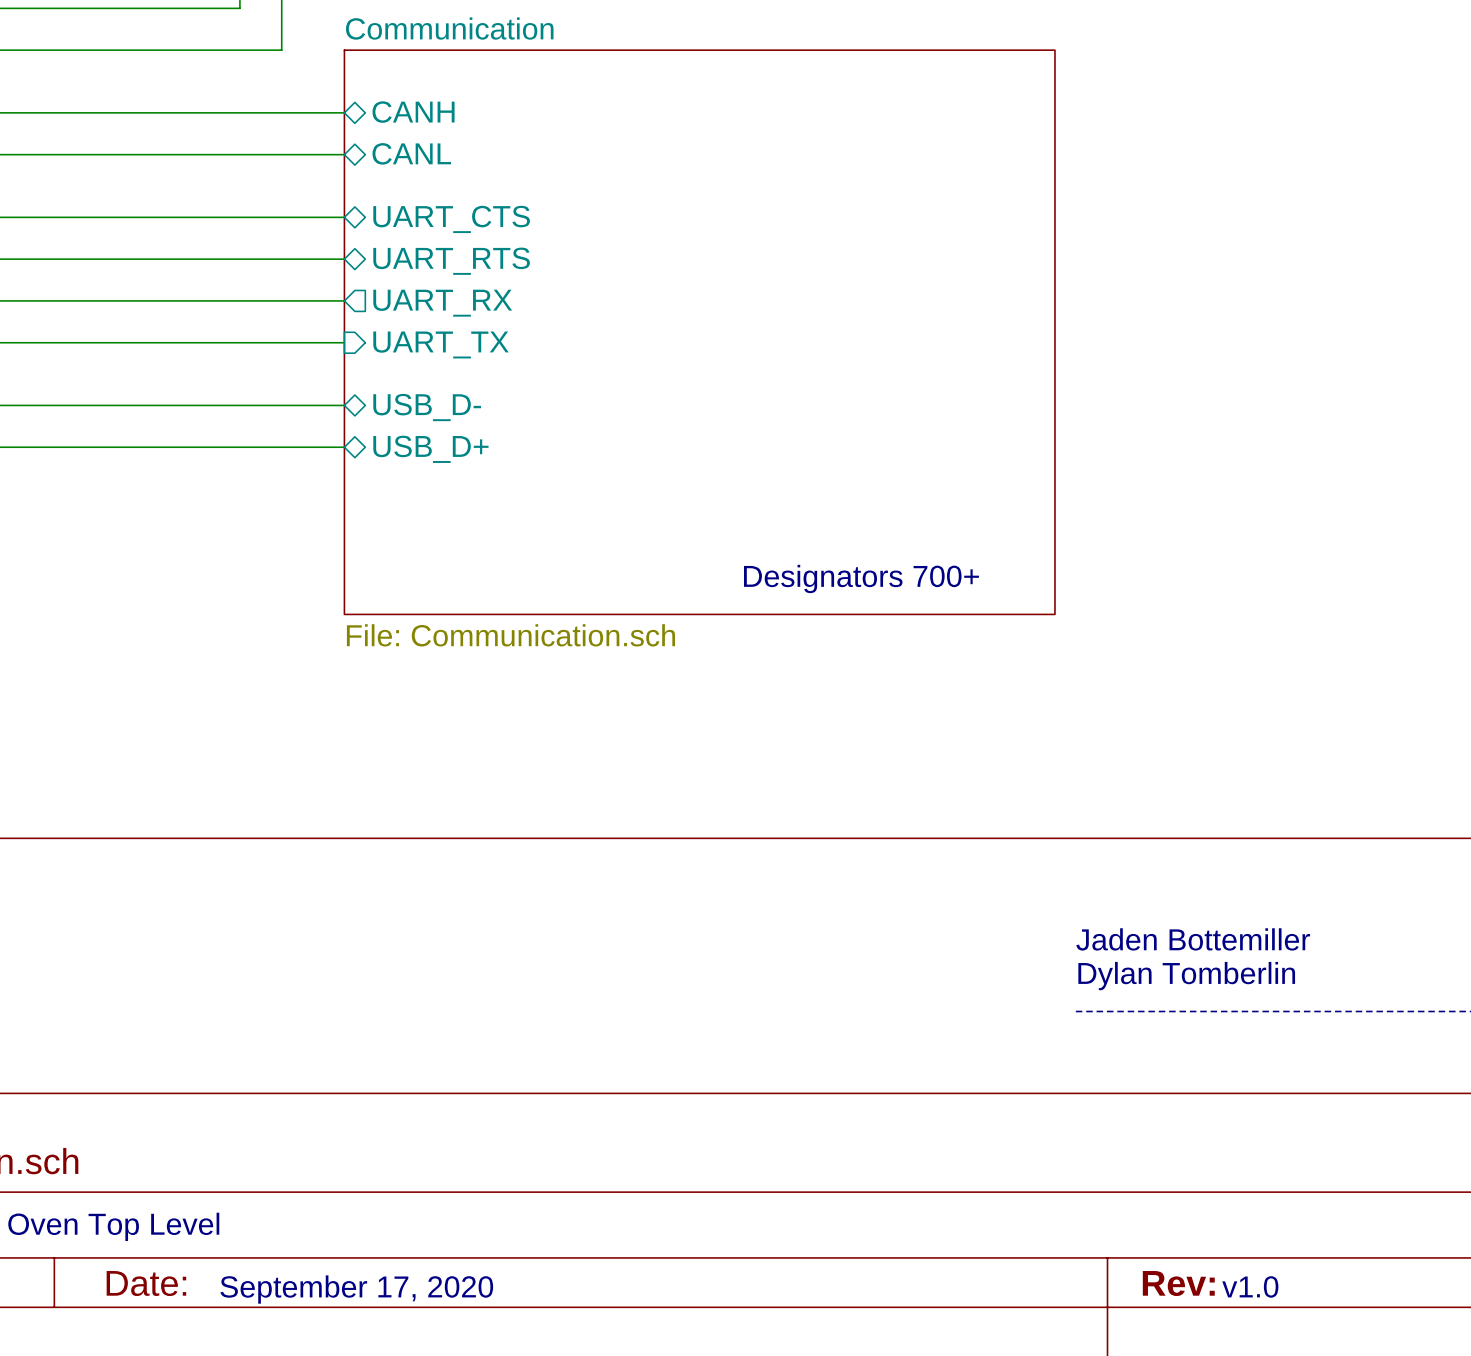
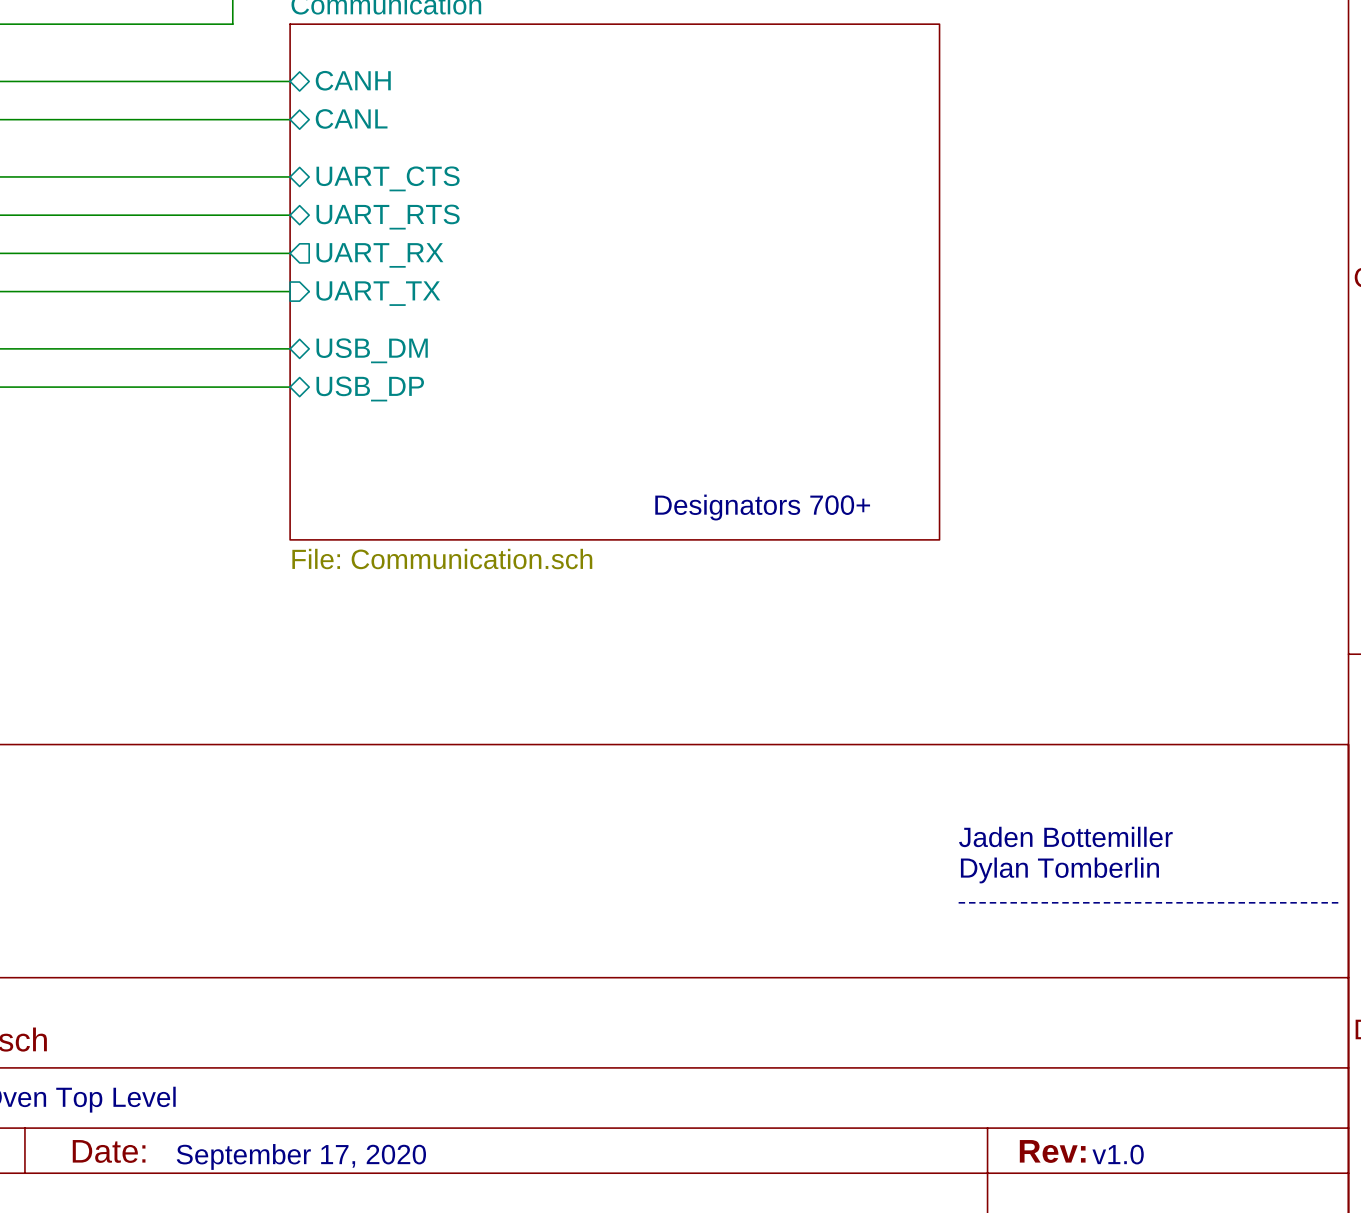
sheet pin: USB_D- (427, 407) -> USB_DM (372, 350)
sheet pin: USB_D+ (430, 449) -> USB_DP (370, 388)

